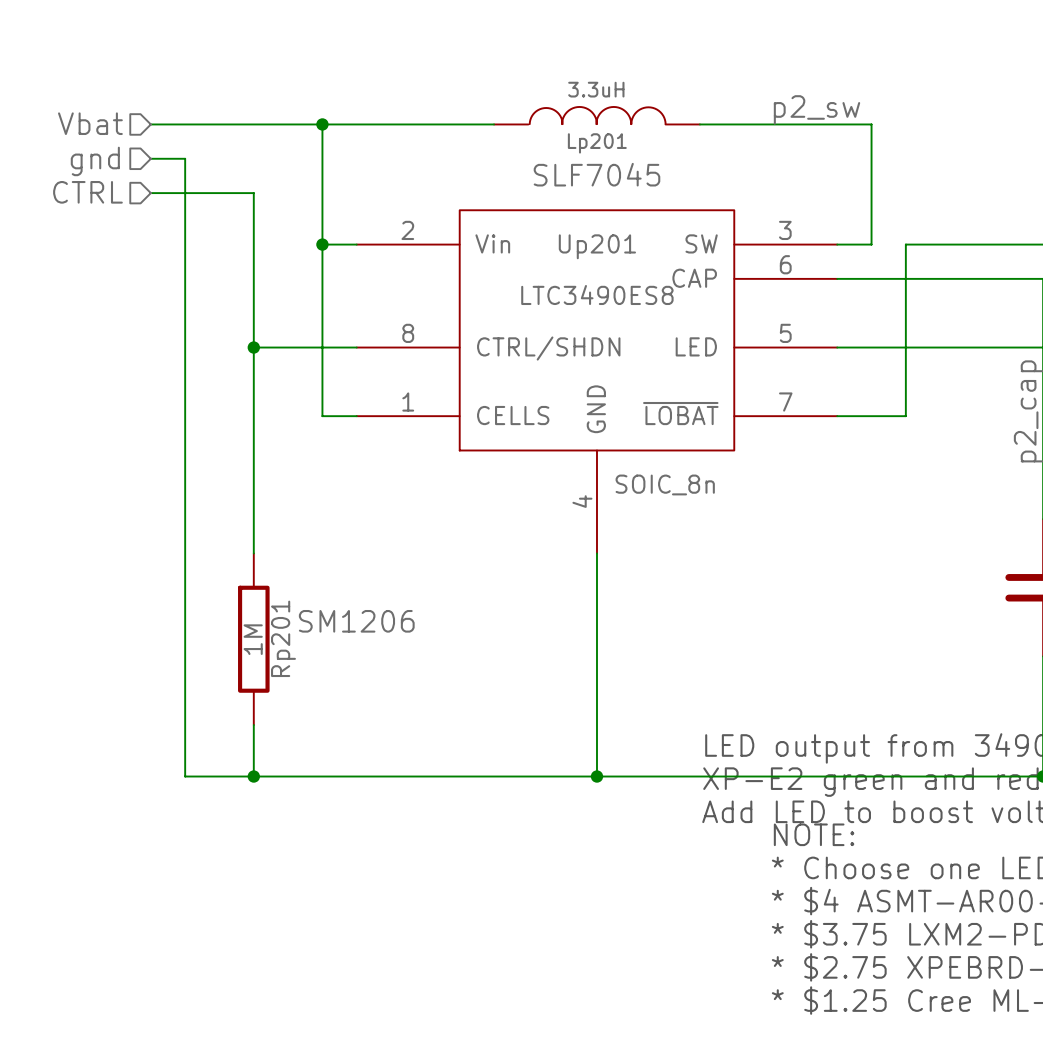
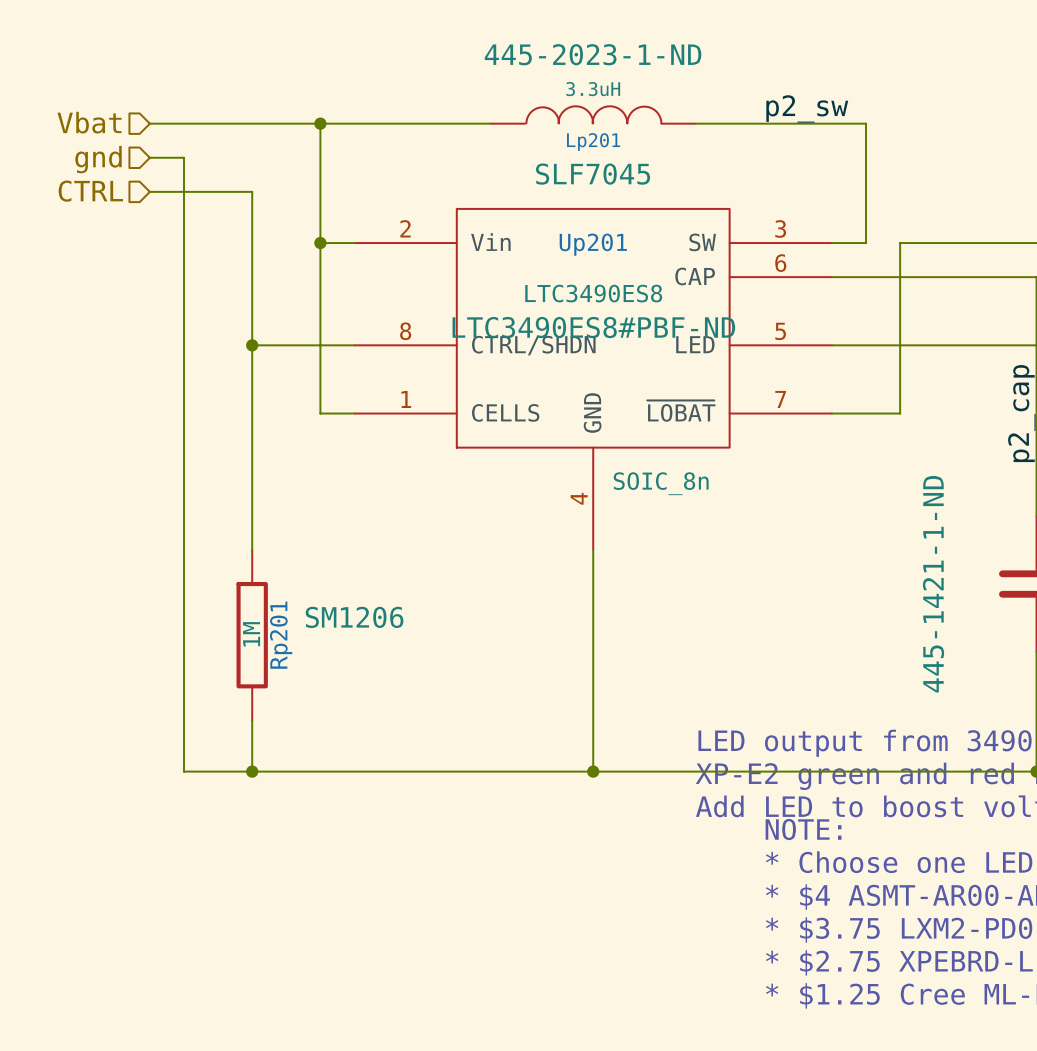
Lp201 text: none -> 445-2023-1-ND (593, 54)
Up201 text: none -> LTC3490ES8#PBF-ND (593, 327)
part text: none -> 445-1421-1-ND (933, 584)

